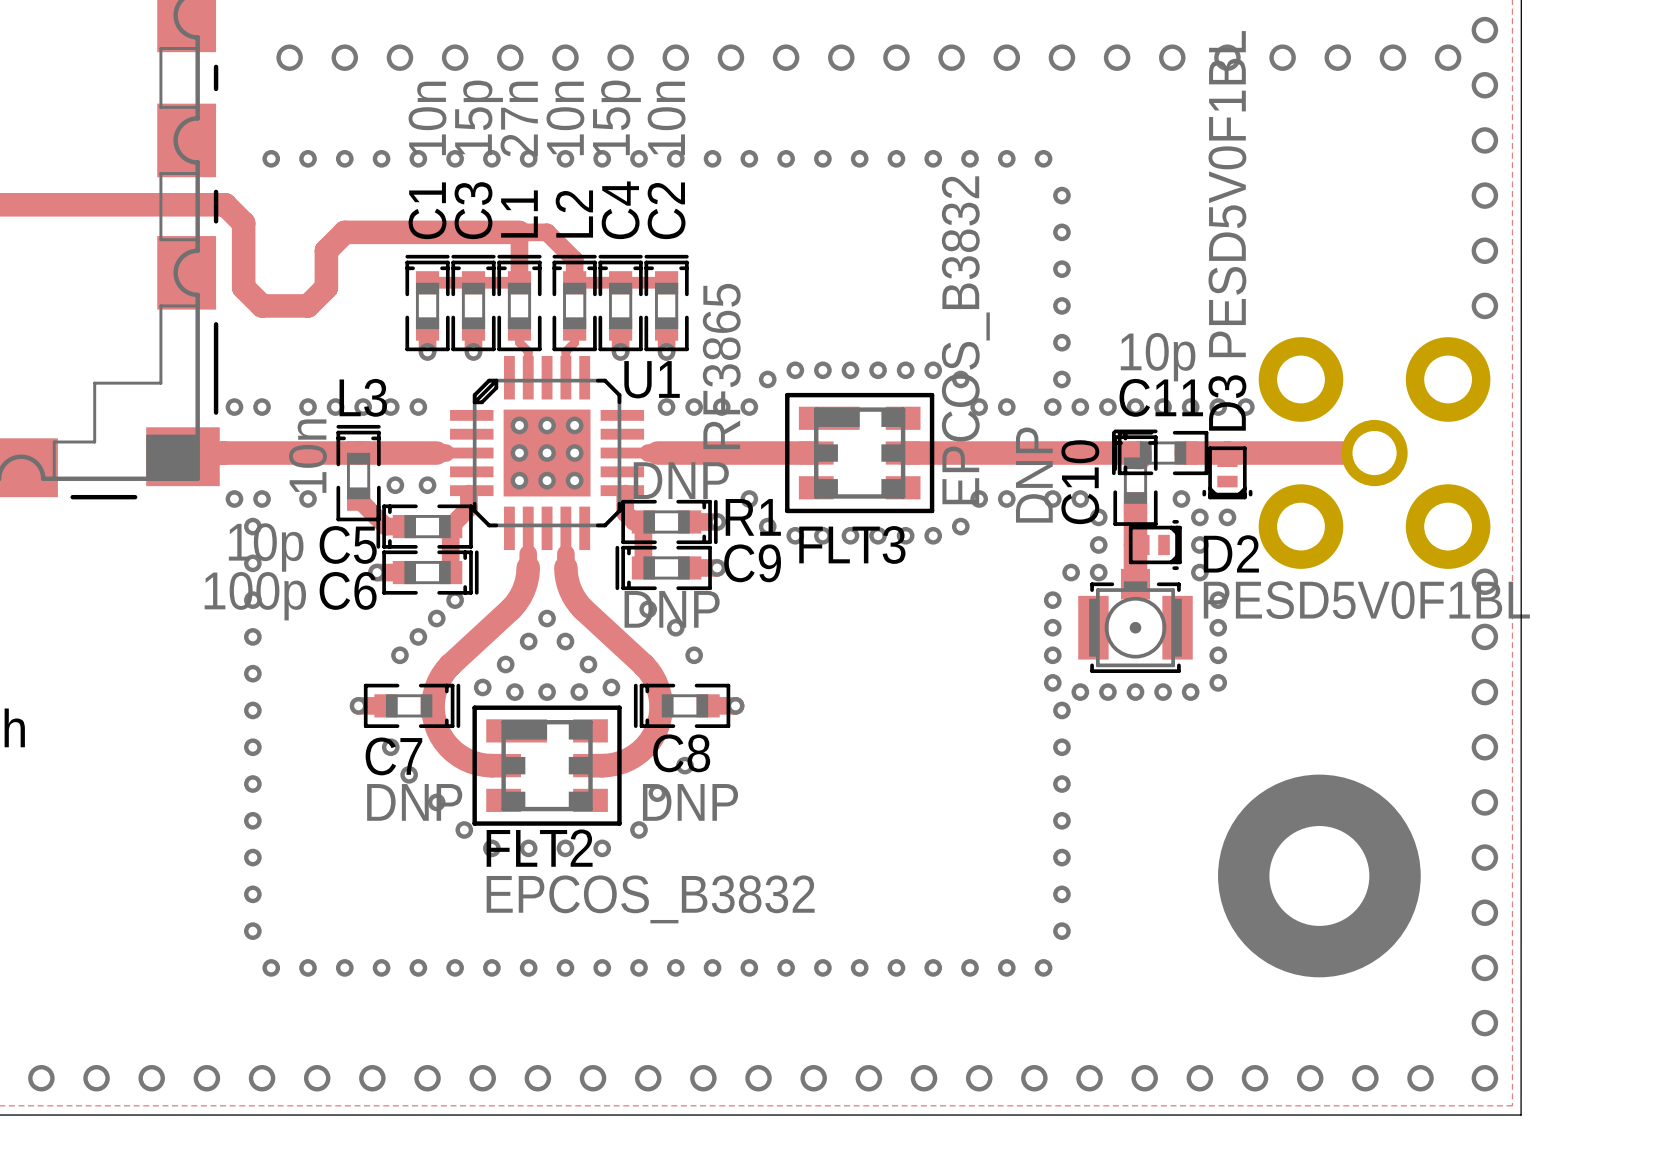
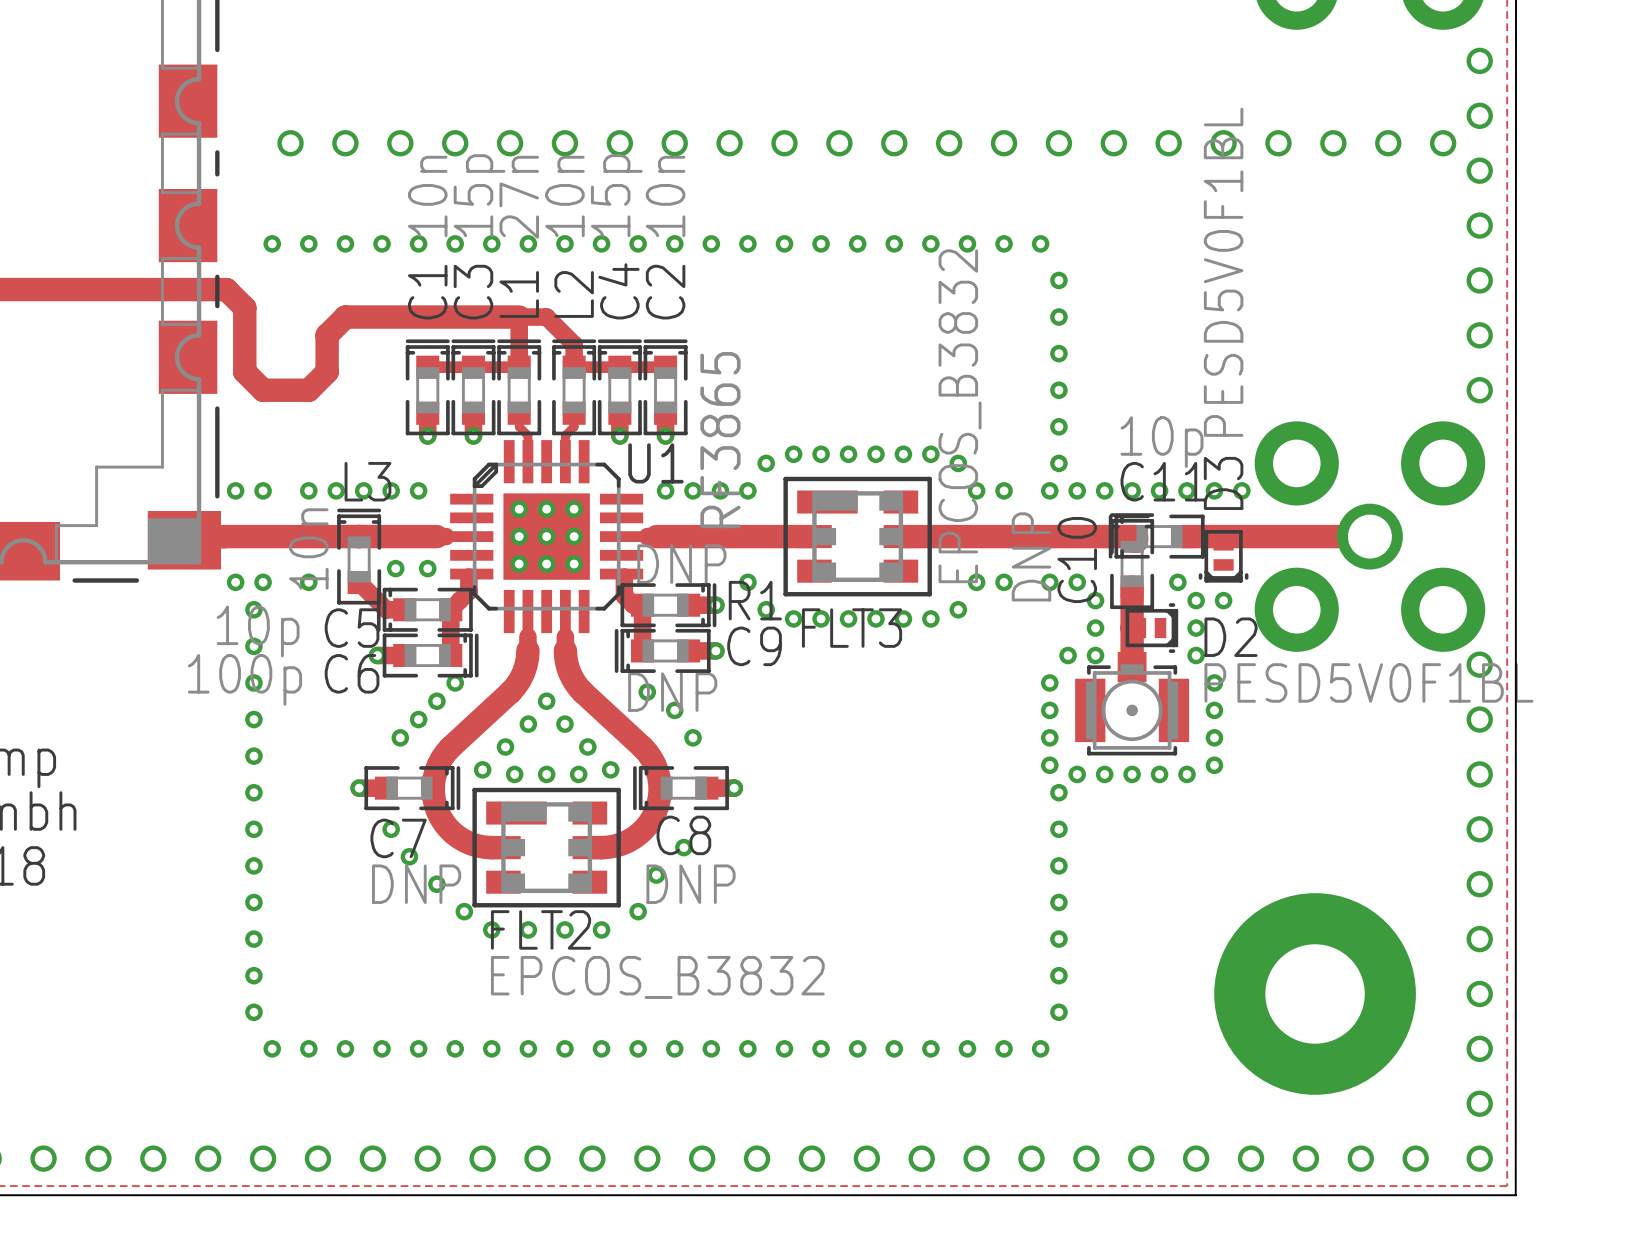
via position: (1319, 875) -> (1315, 993)

